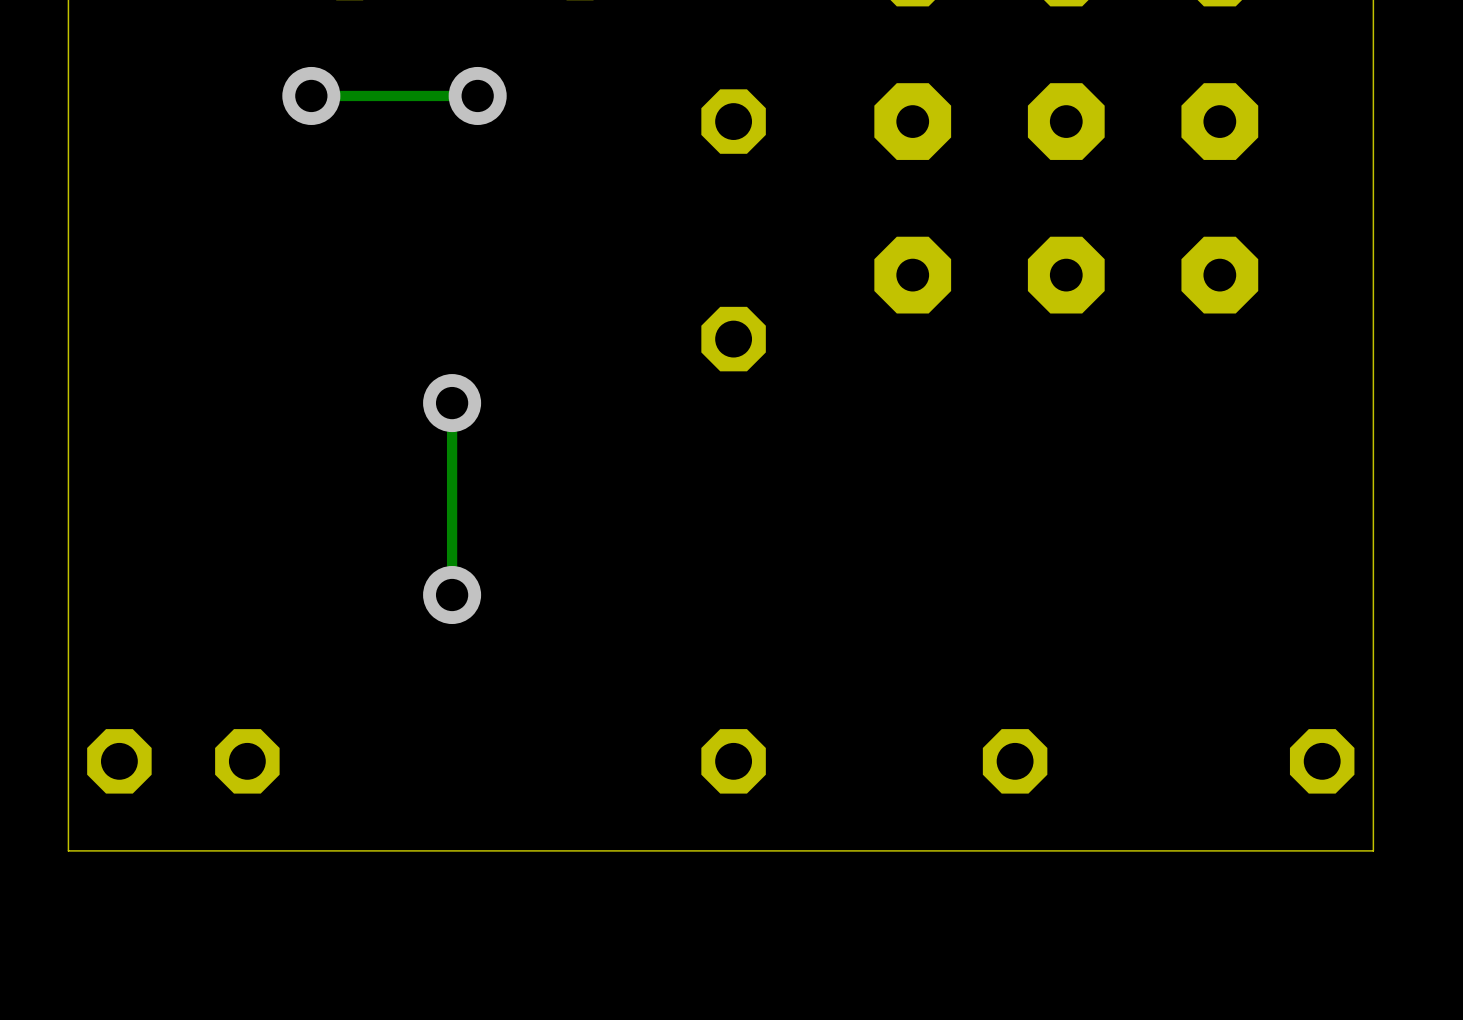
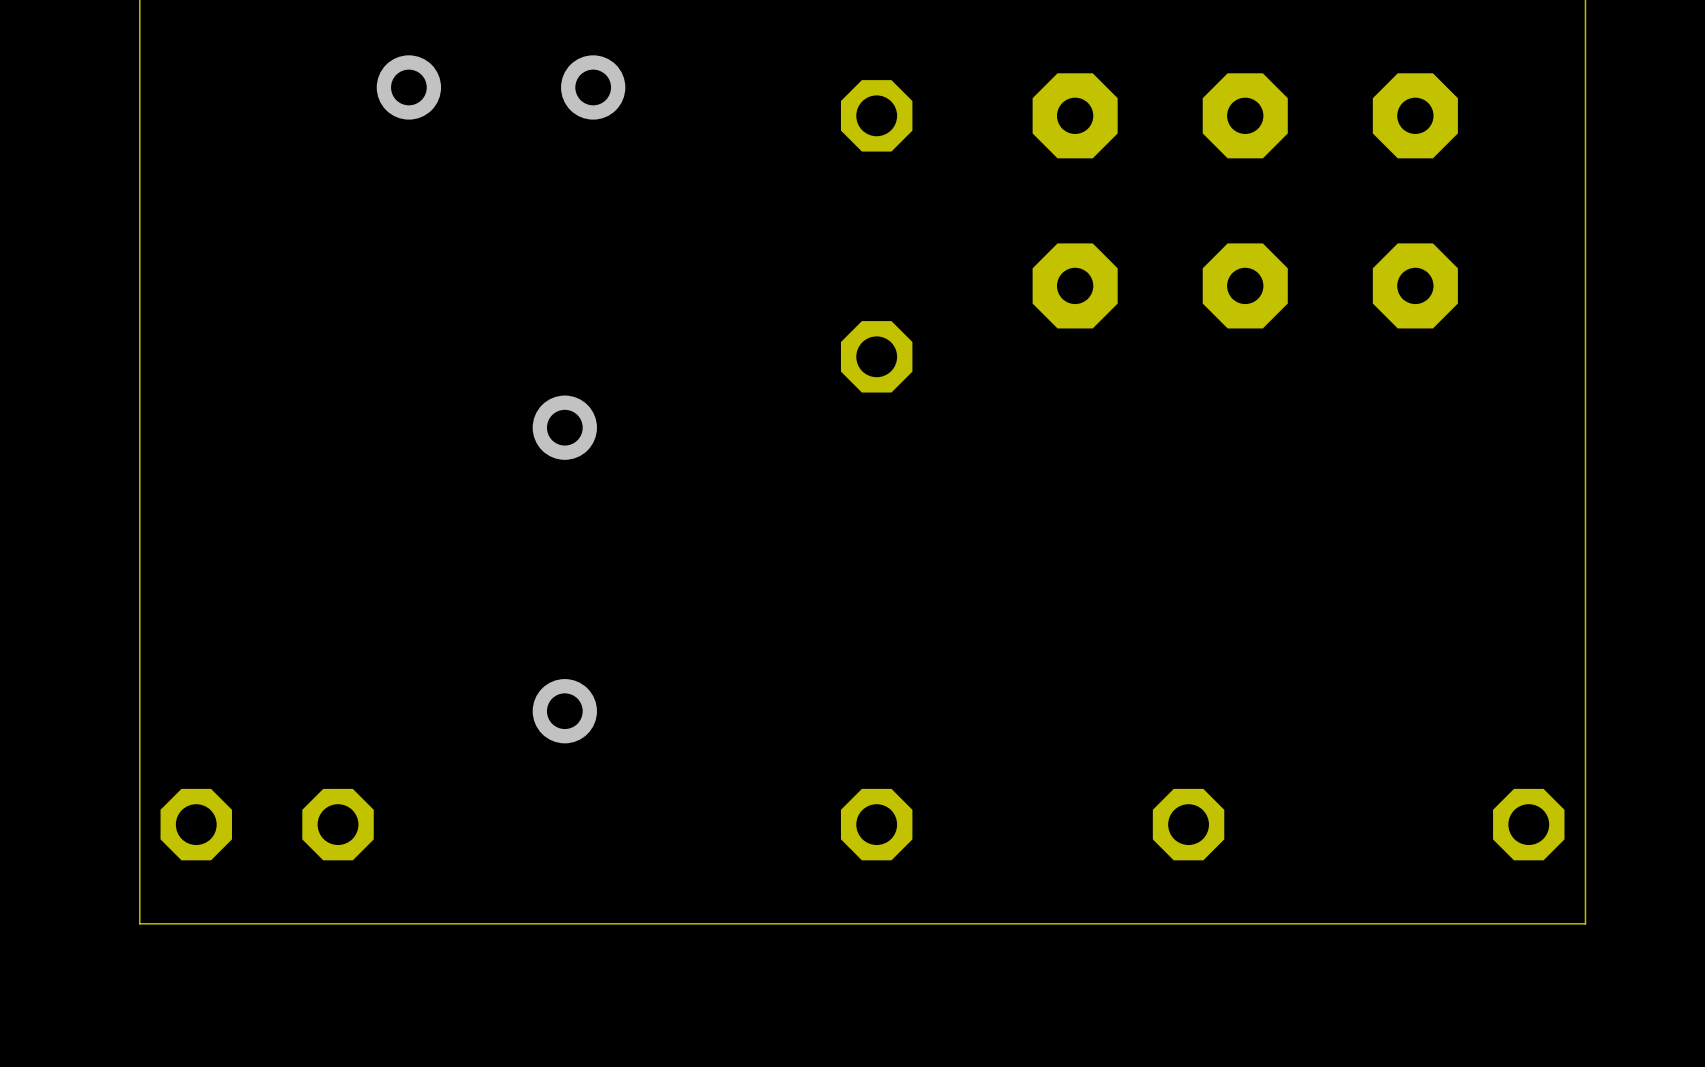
track: (477, 95) (311, 95) -> none
track: (452, 403) (452, 595) -> none
via position: (452, 595) -> (564, 711)

